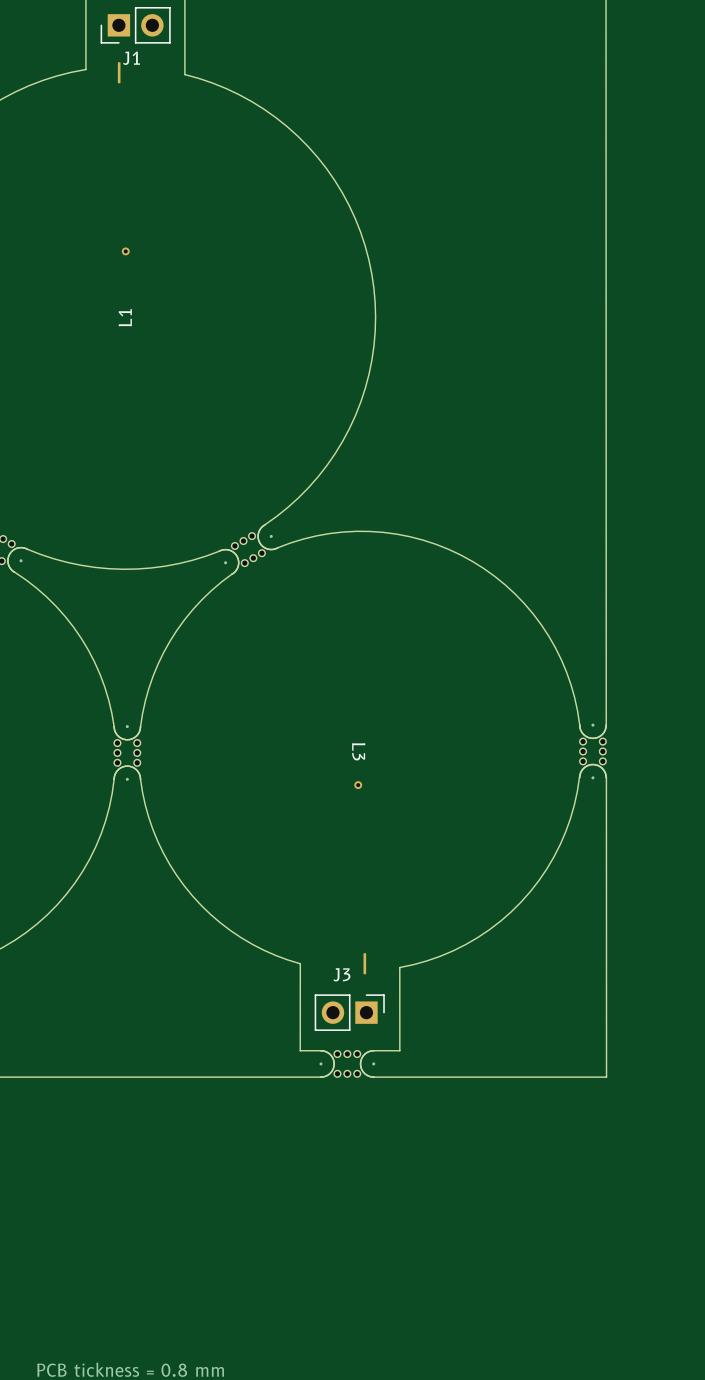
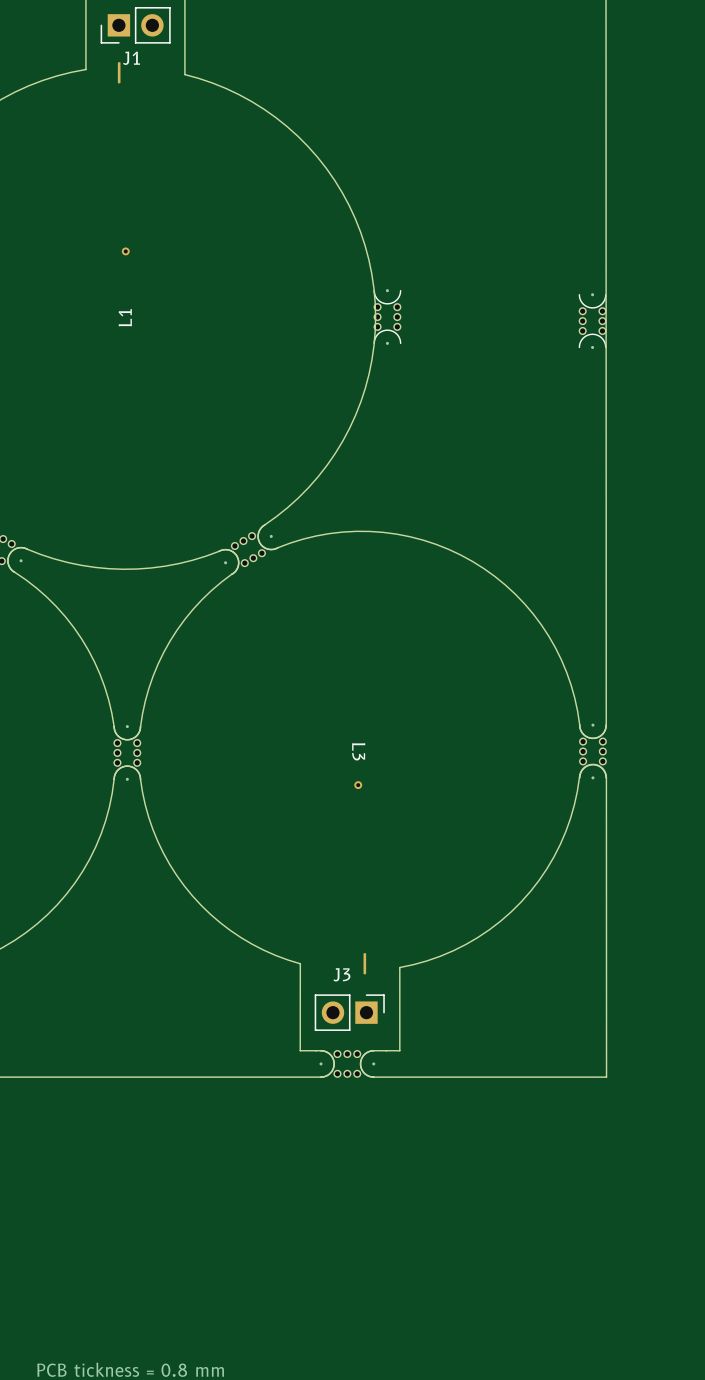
part: none -> (387, 317)
part: none -> (592, 321)

